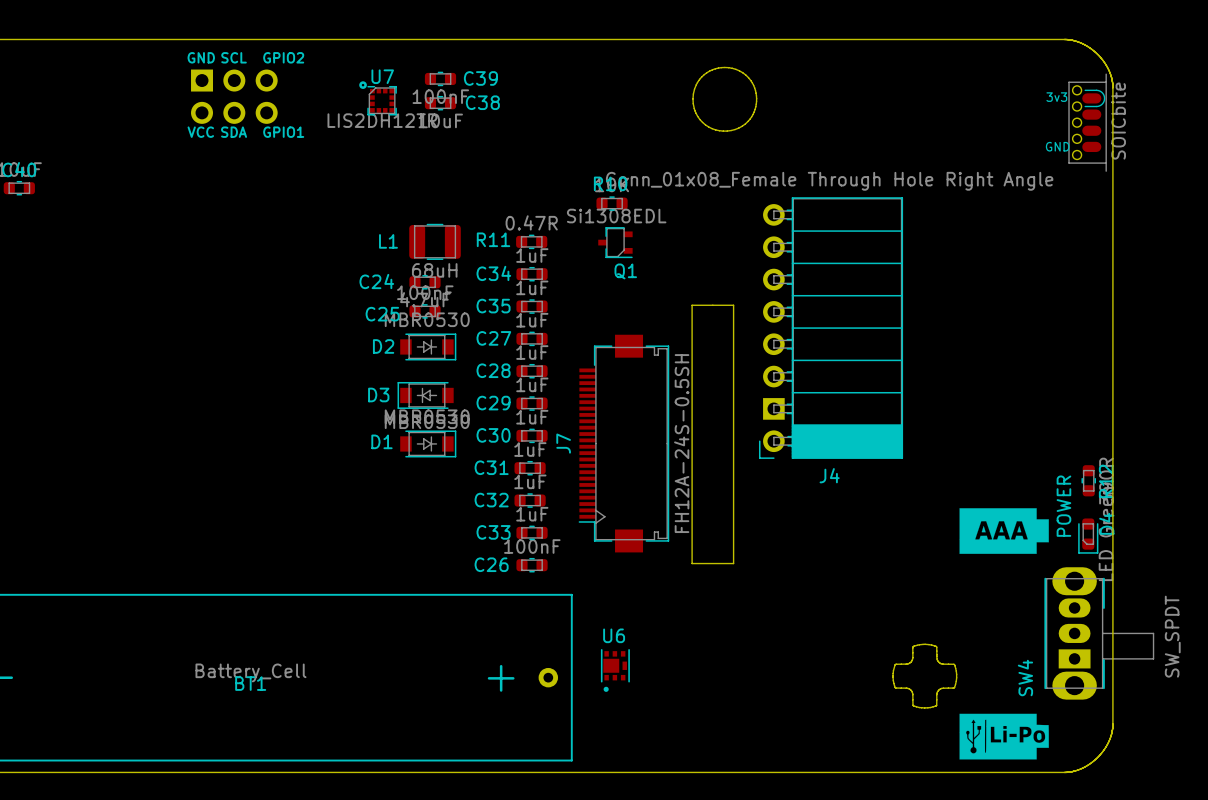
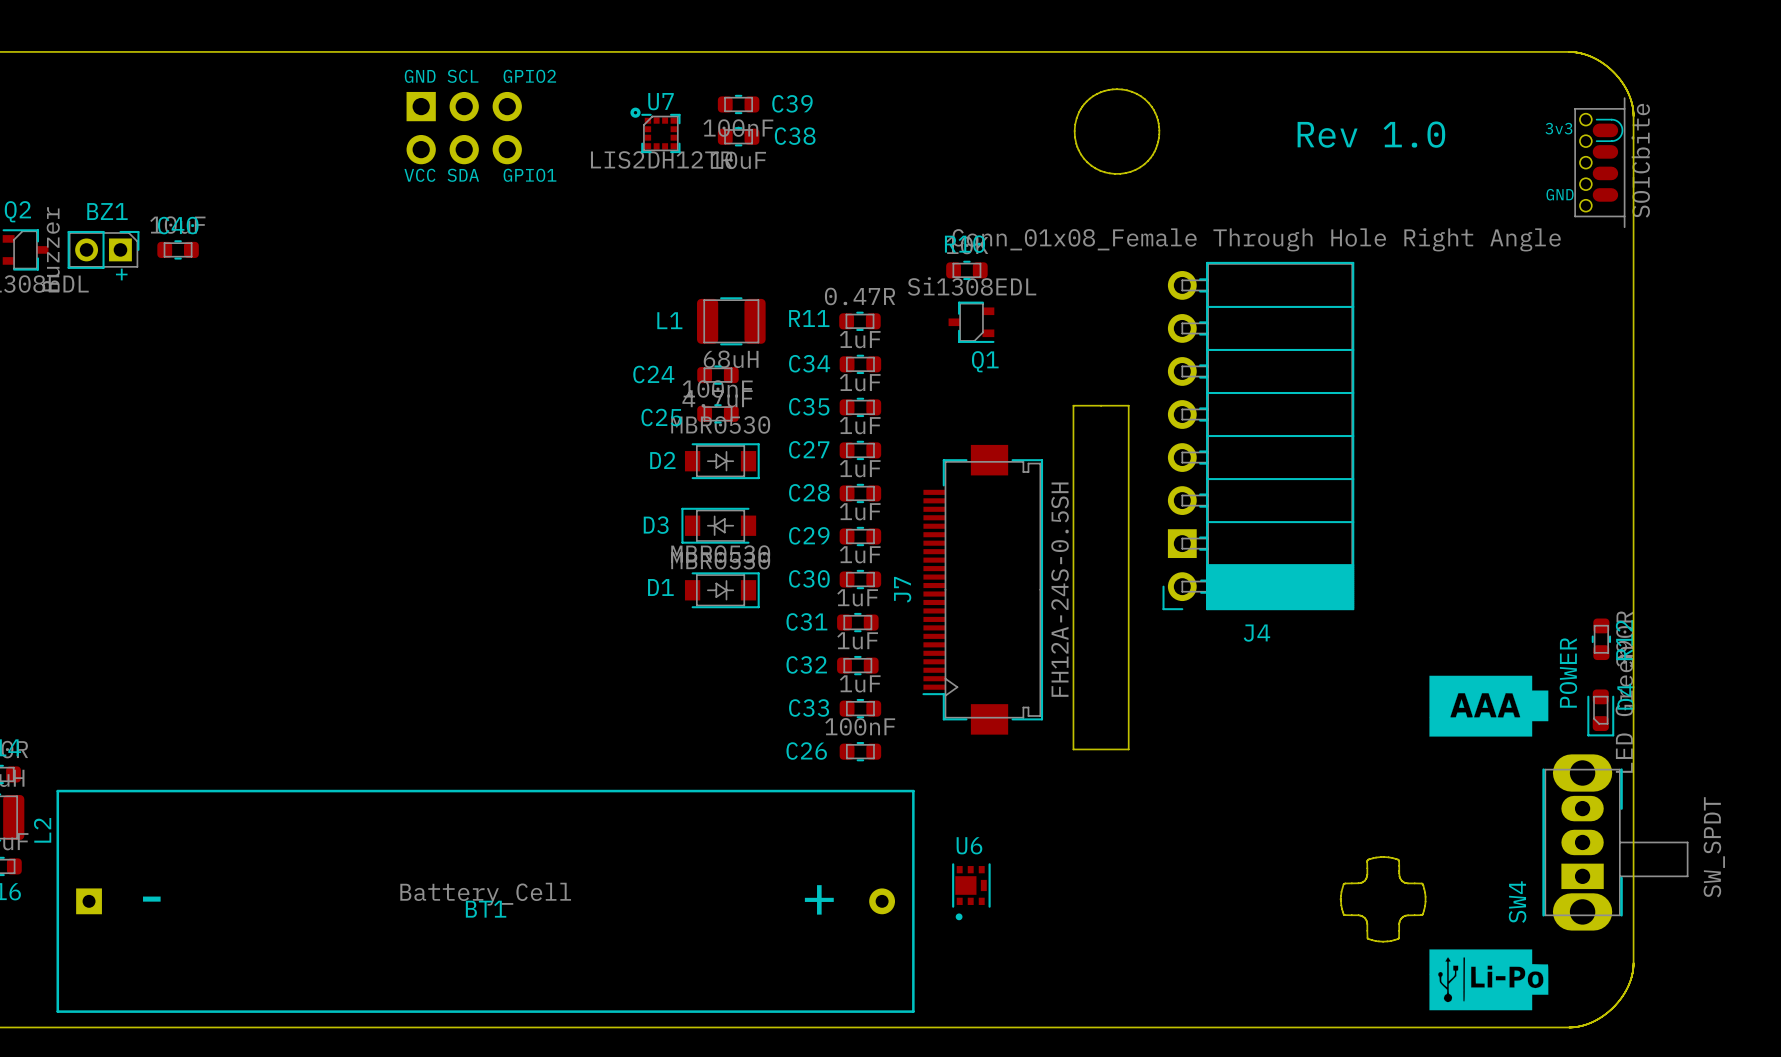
text: none -> Rev 1.0 (1371, 134)

